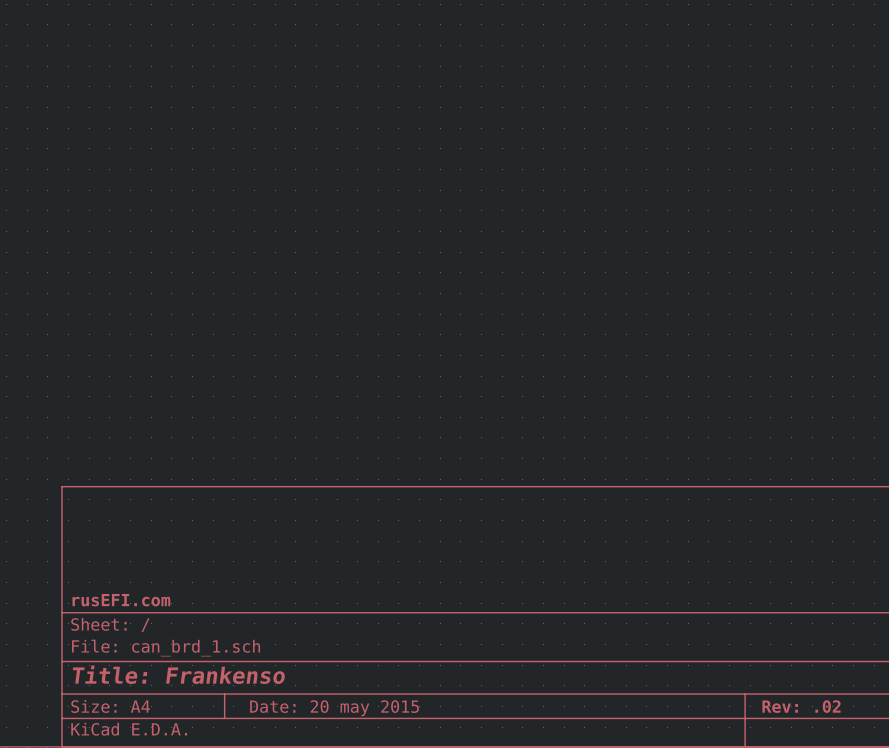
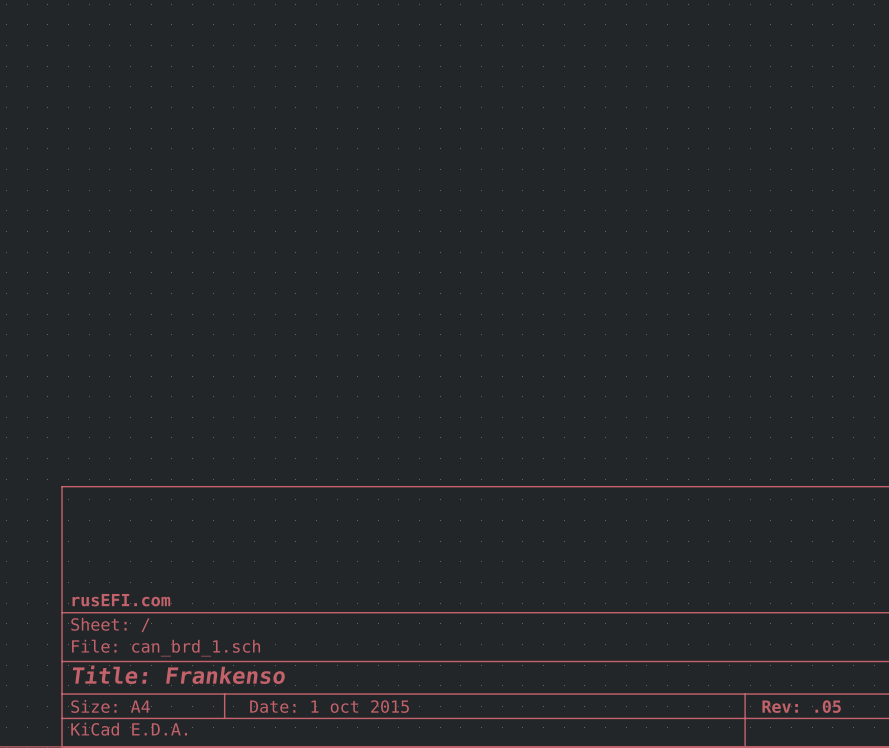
title block: Rev: .02 (801, 706) -> Rev: .05 (801, 706)
title block: Date: 20 may 2015 (334, 708) -> Date: 1 oct 2015 (329, 706)

